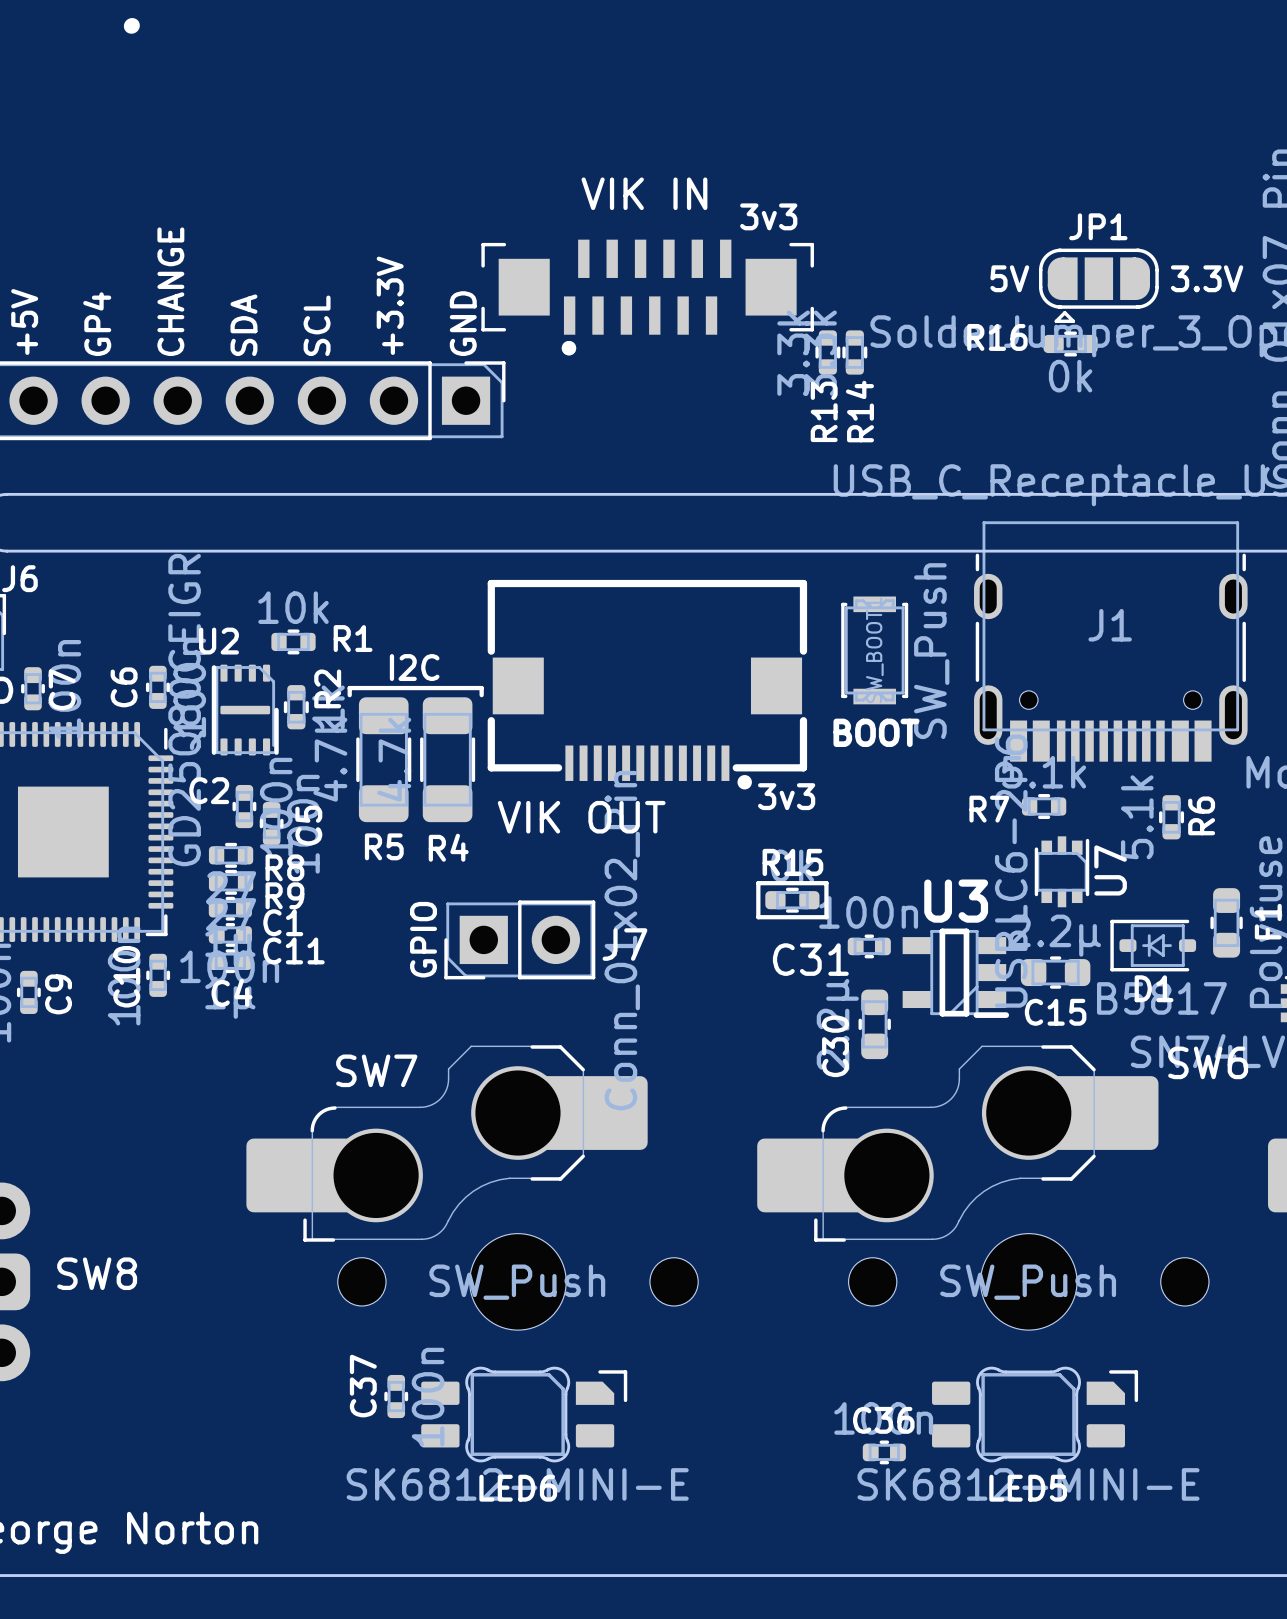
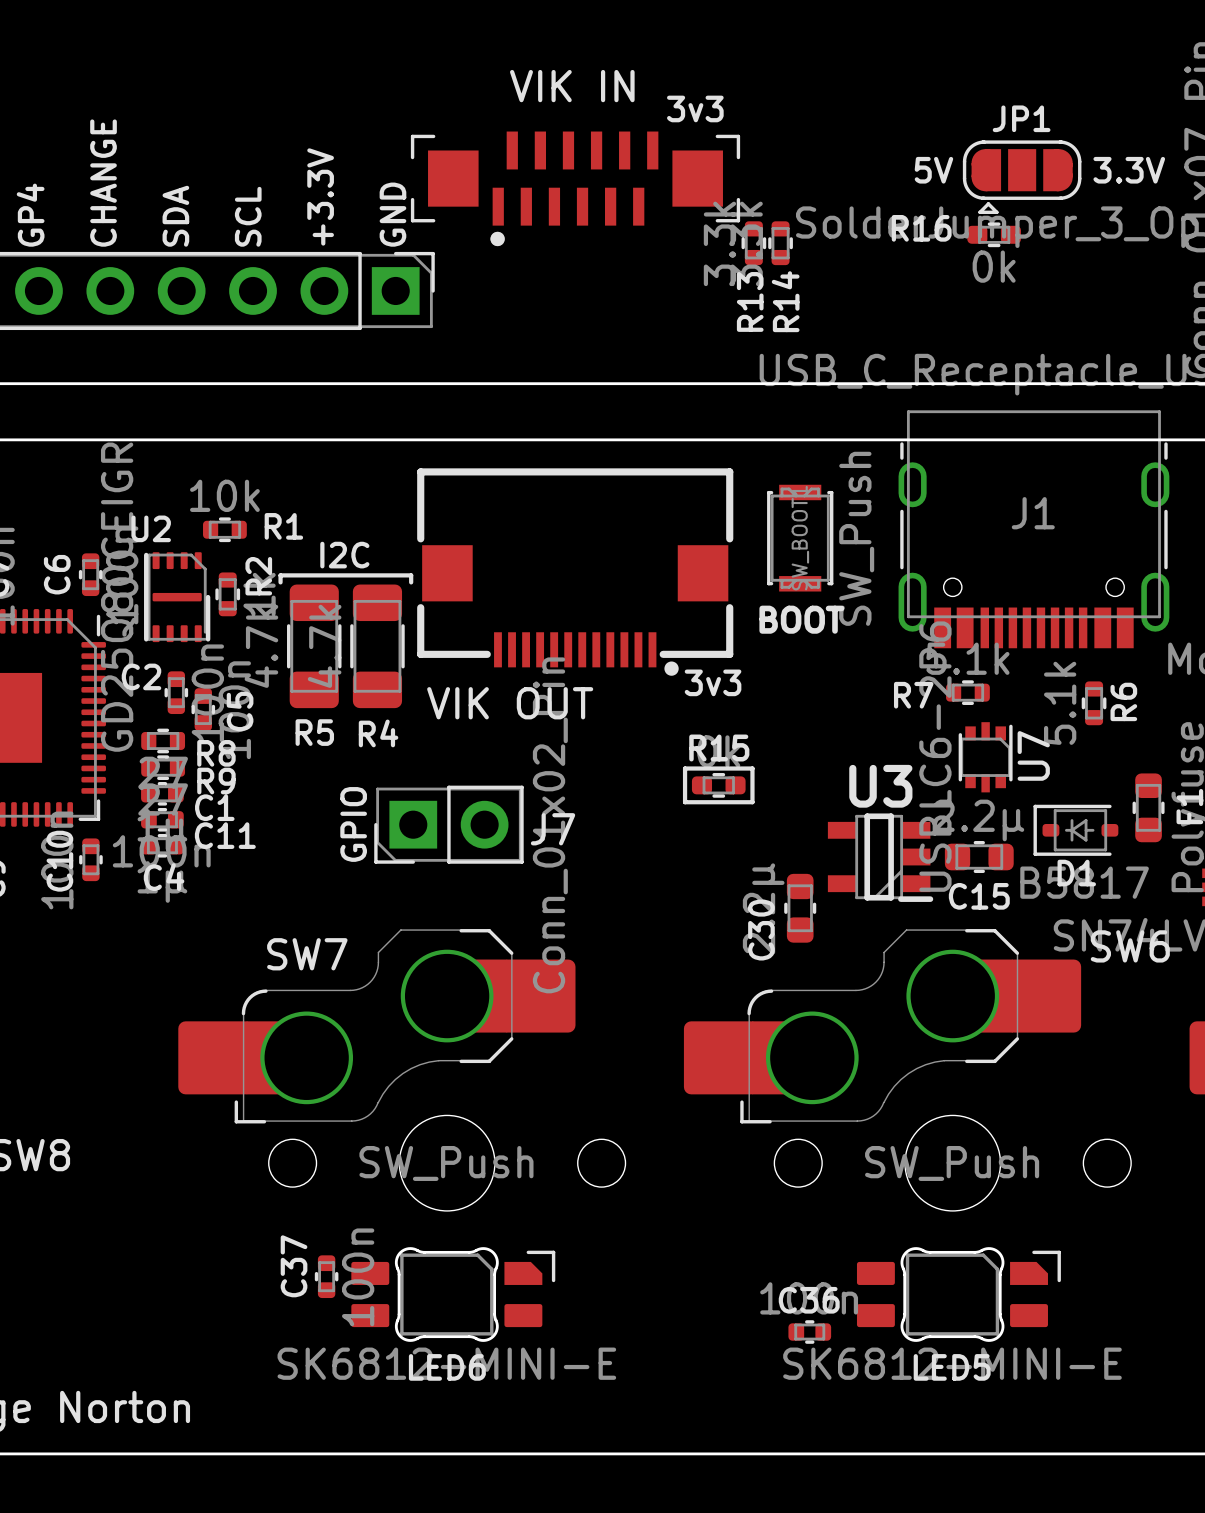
C31: 100n (869, 946) -> none

